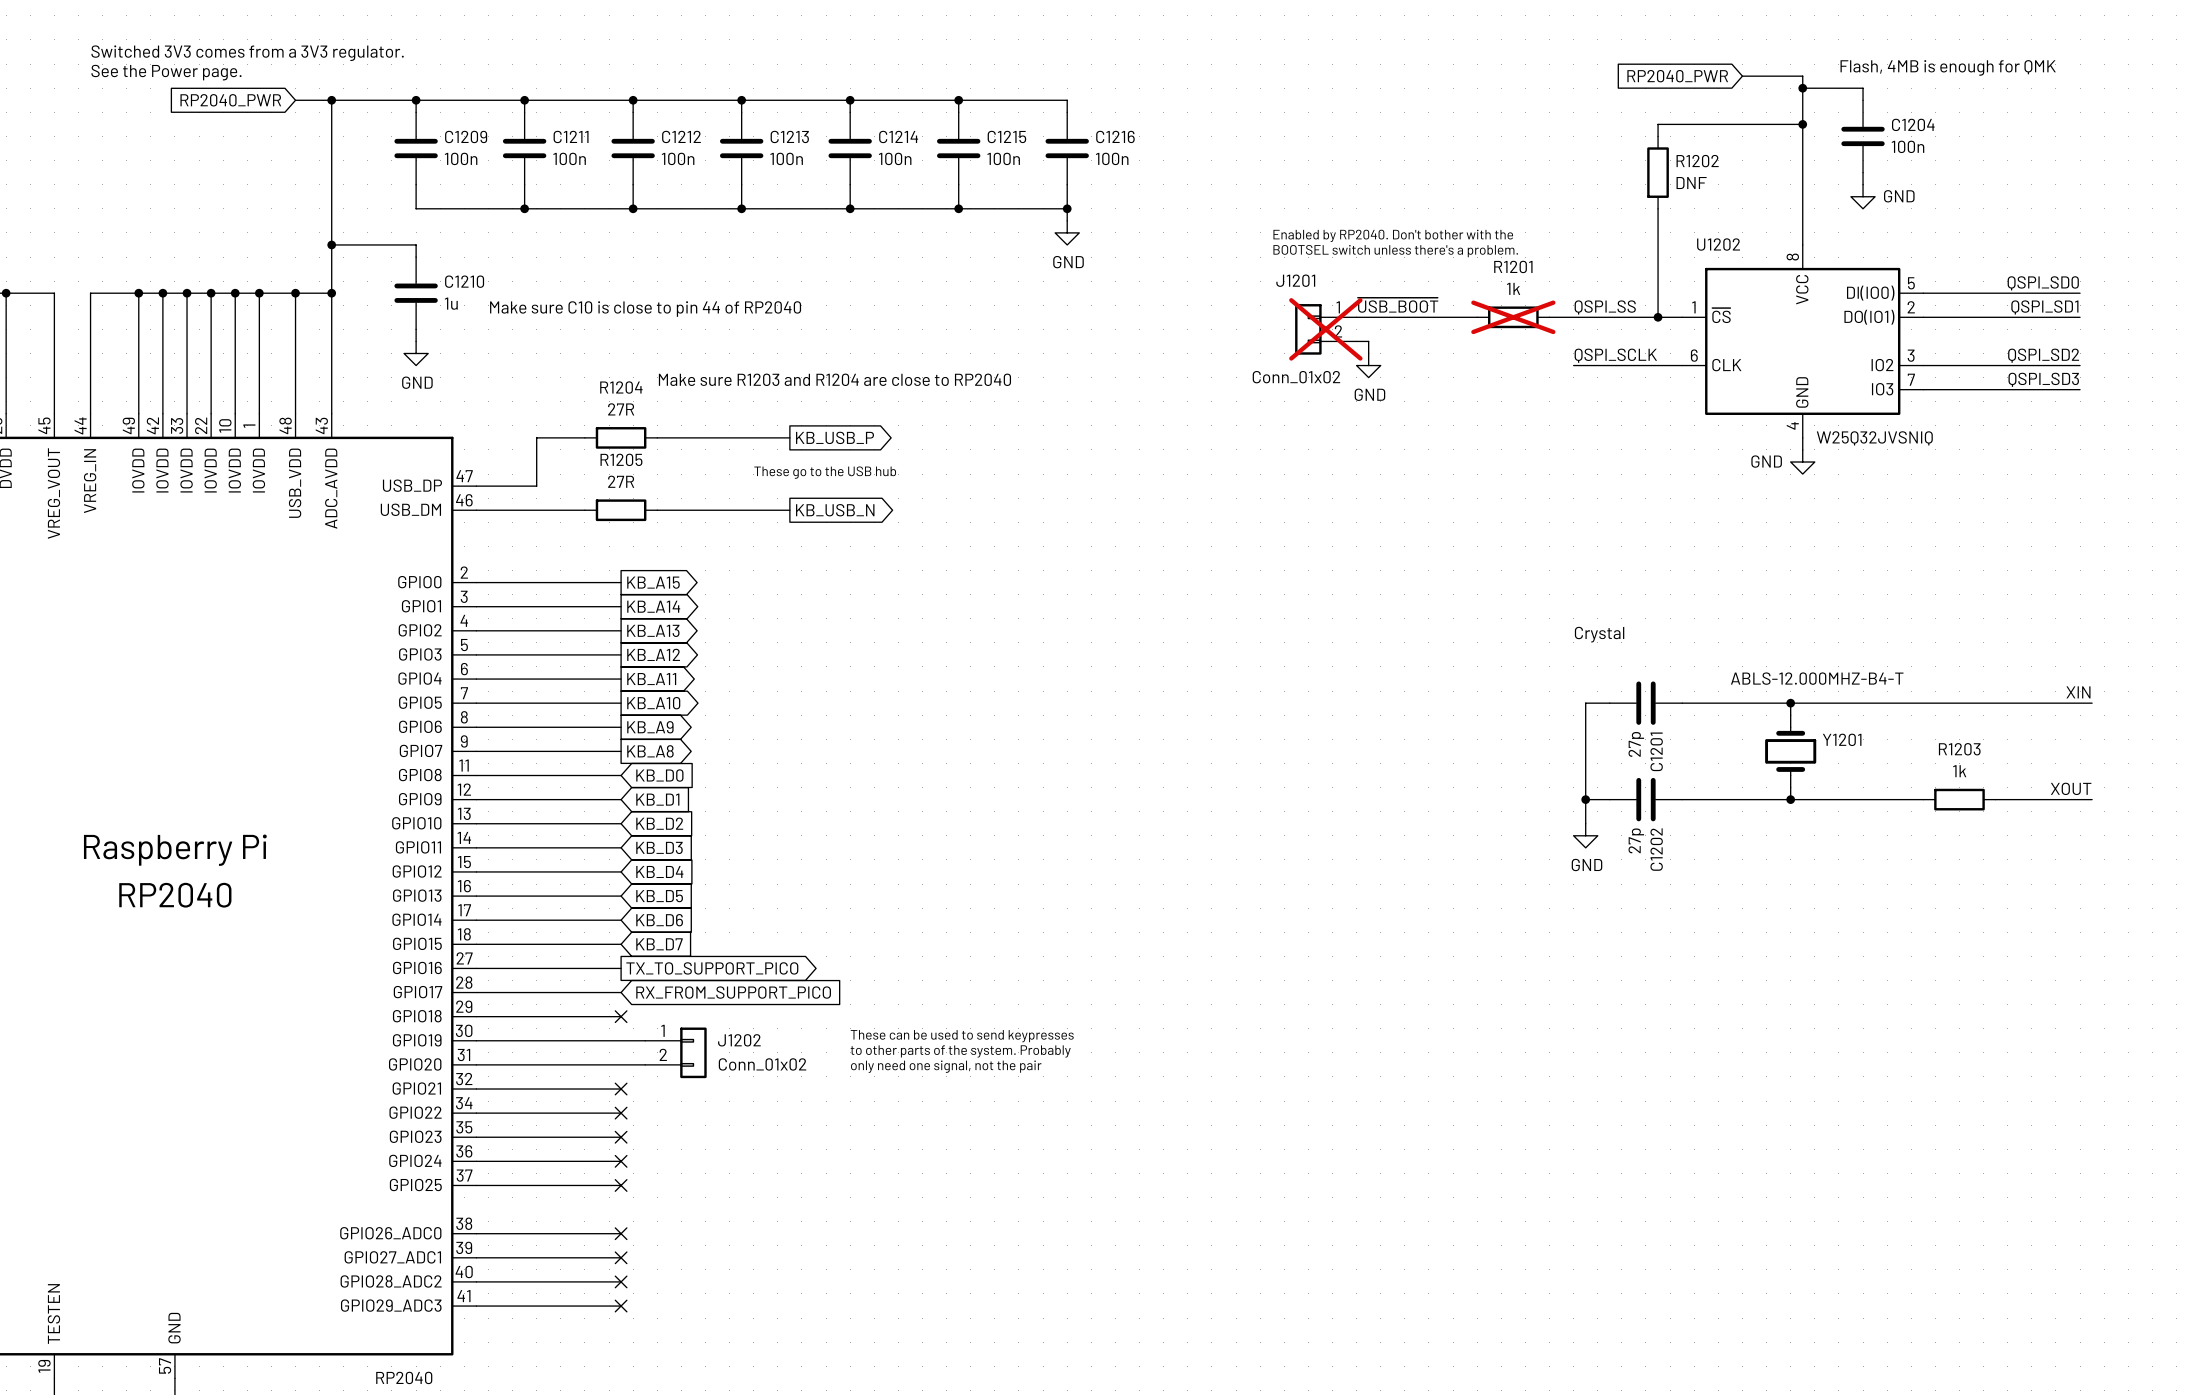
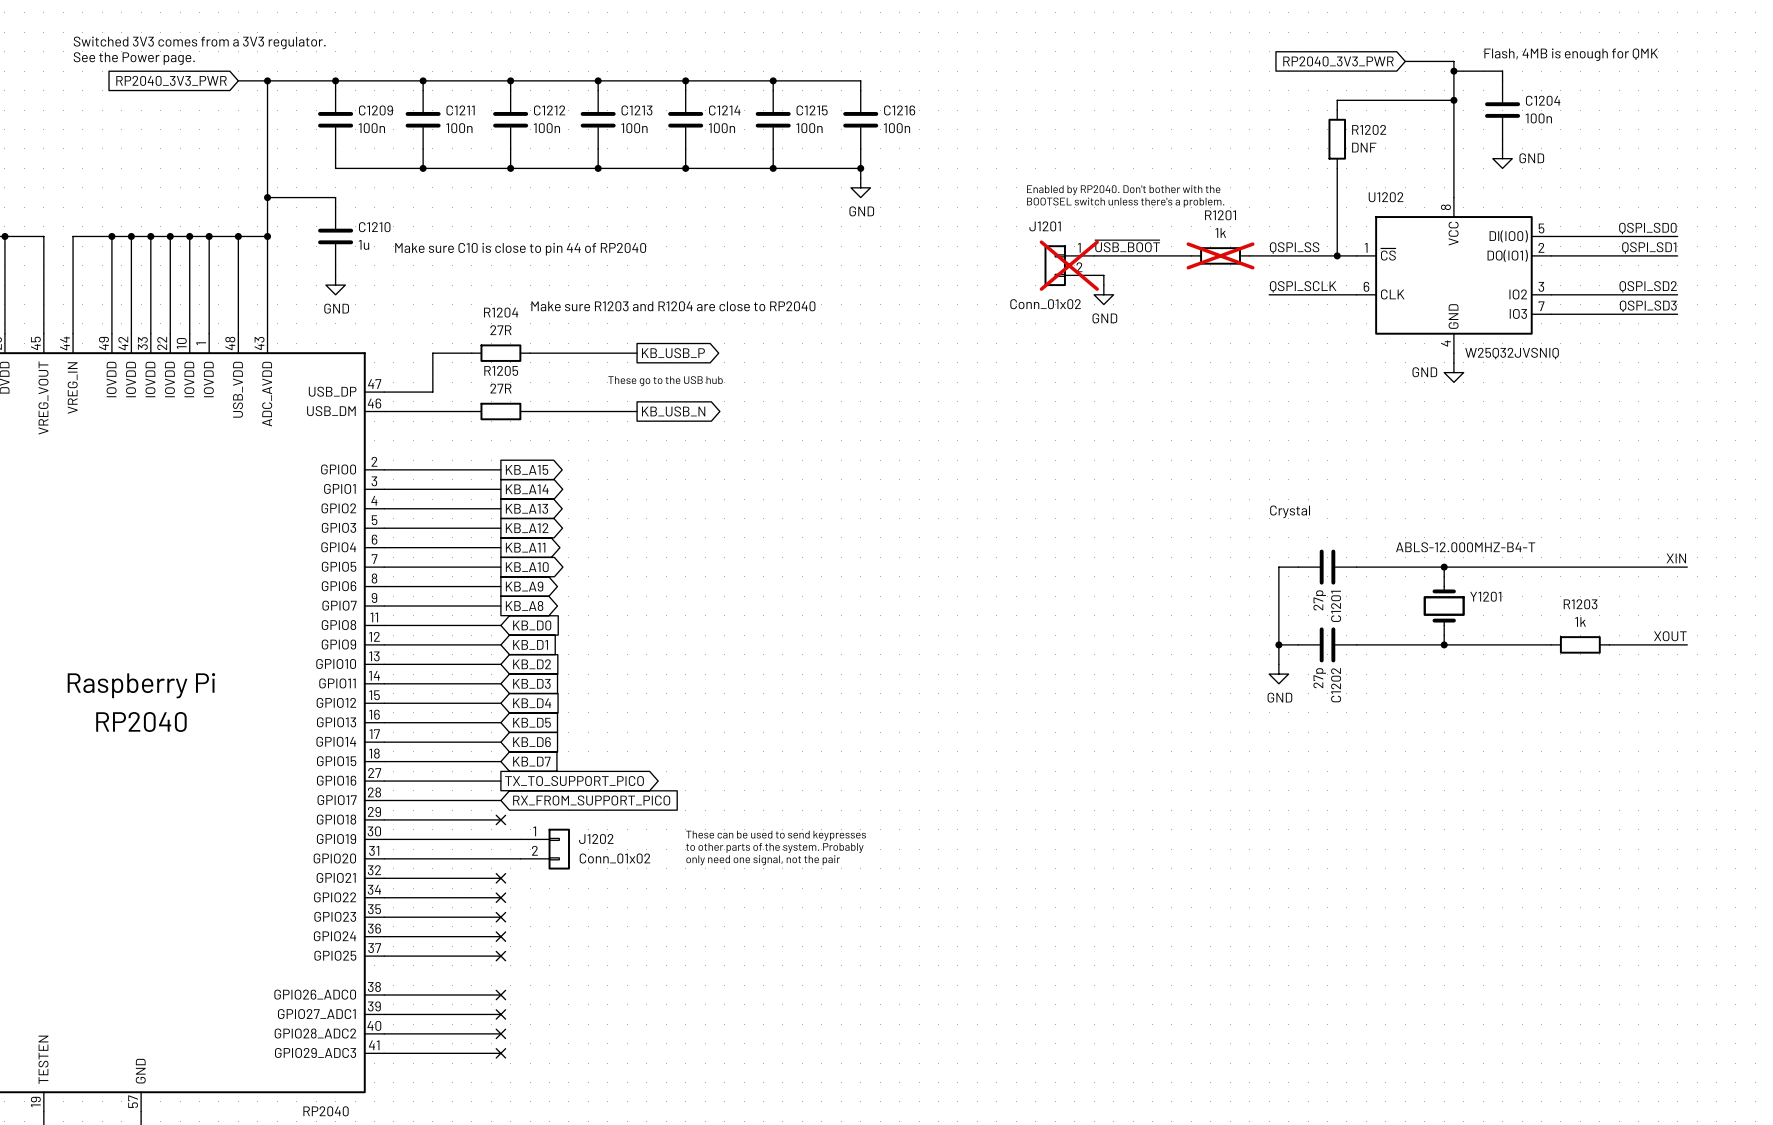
global label: RP2040_PWR (1677, 76) -> RP2040_3V3_PWR (1338, 61)
global label: RP2040_PWR (230, 100) -> RP2040_3V3_PWR (171, 80)

